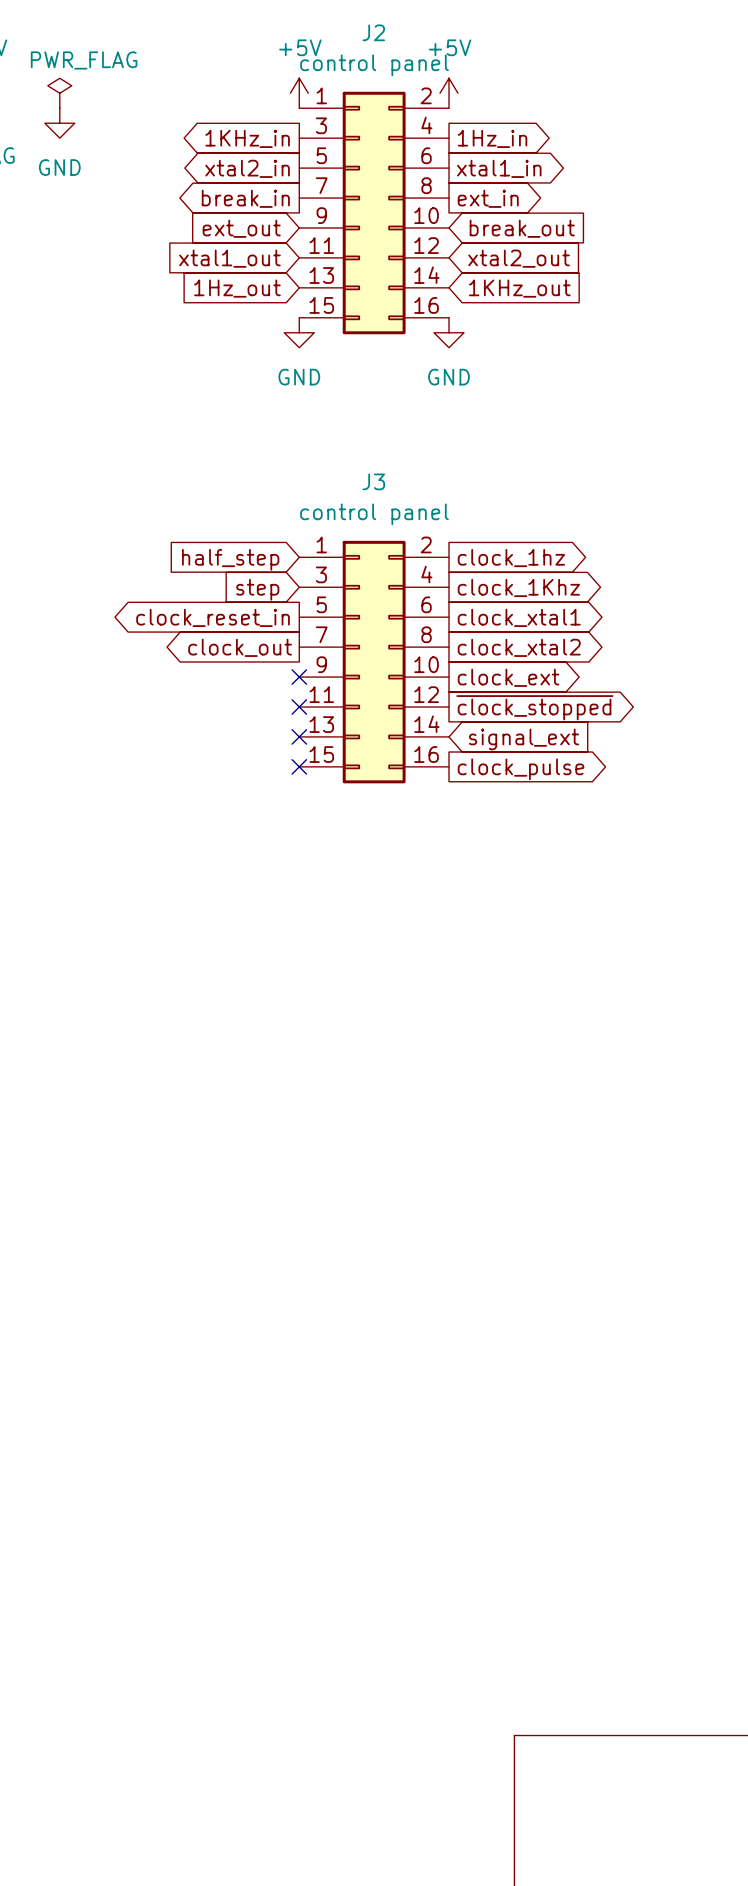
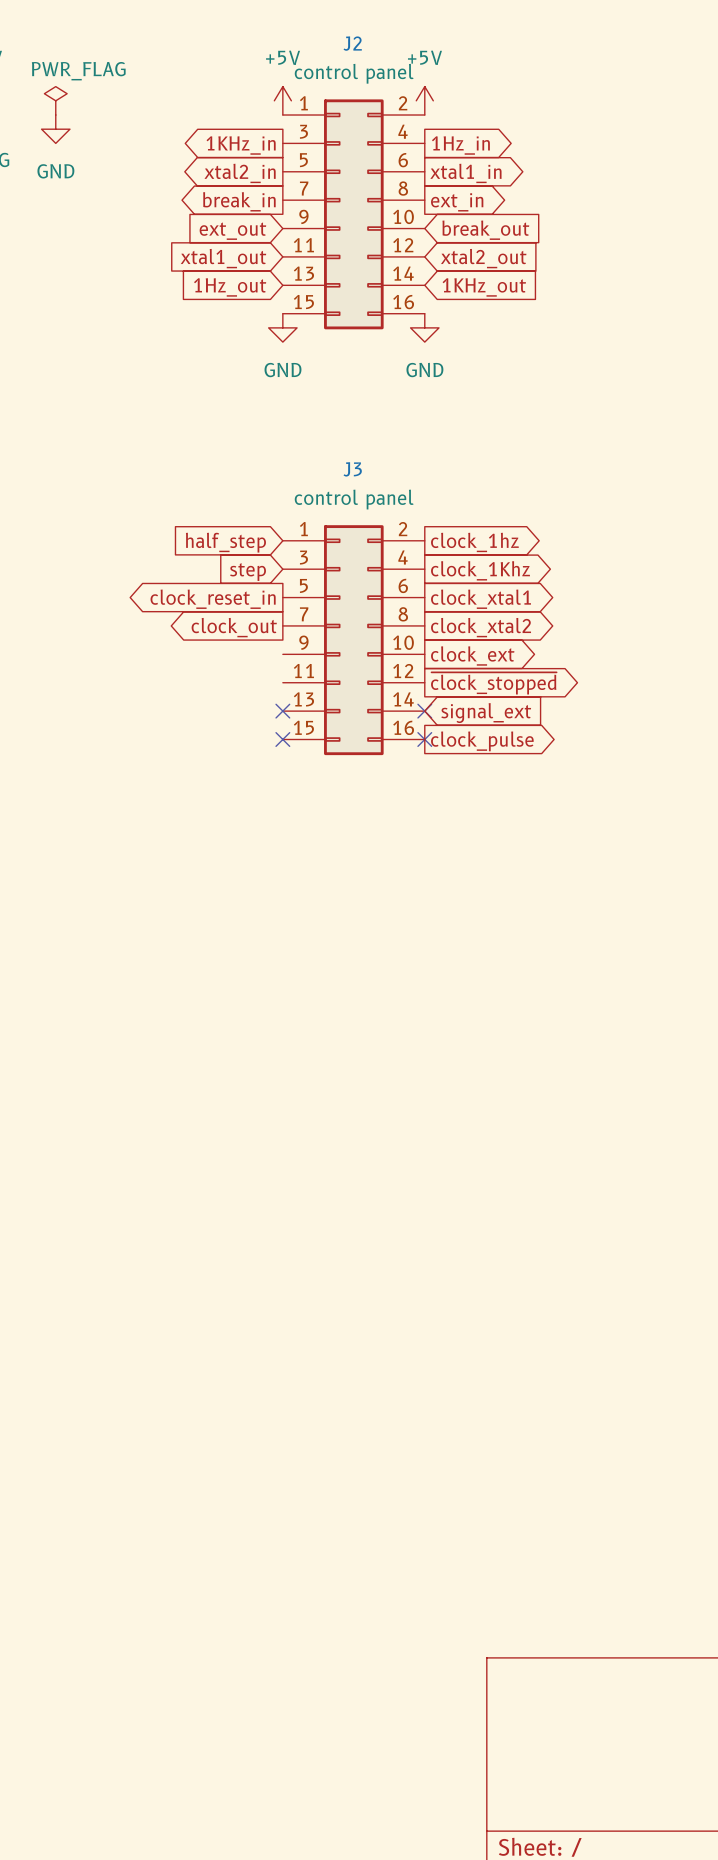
no-connect mark: (299, 677) -> none
no-connect mark: (299, 707) -> none
no-connect mark: none -> (424, 711)
no-connect mark: none -> (424, 739)

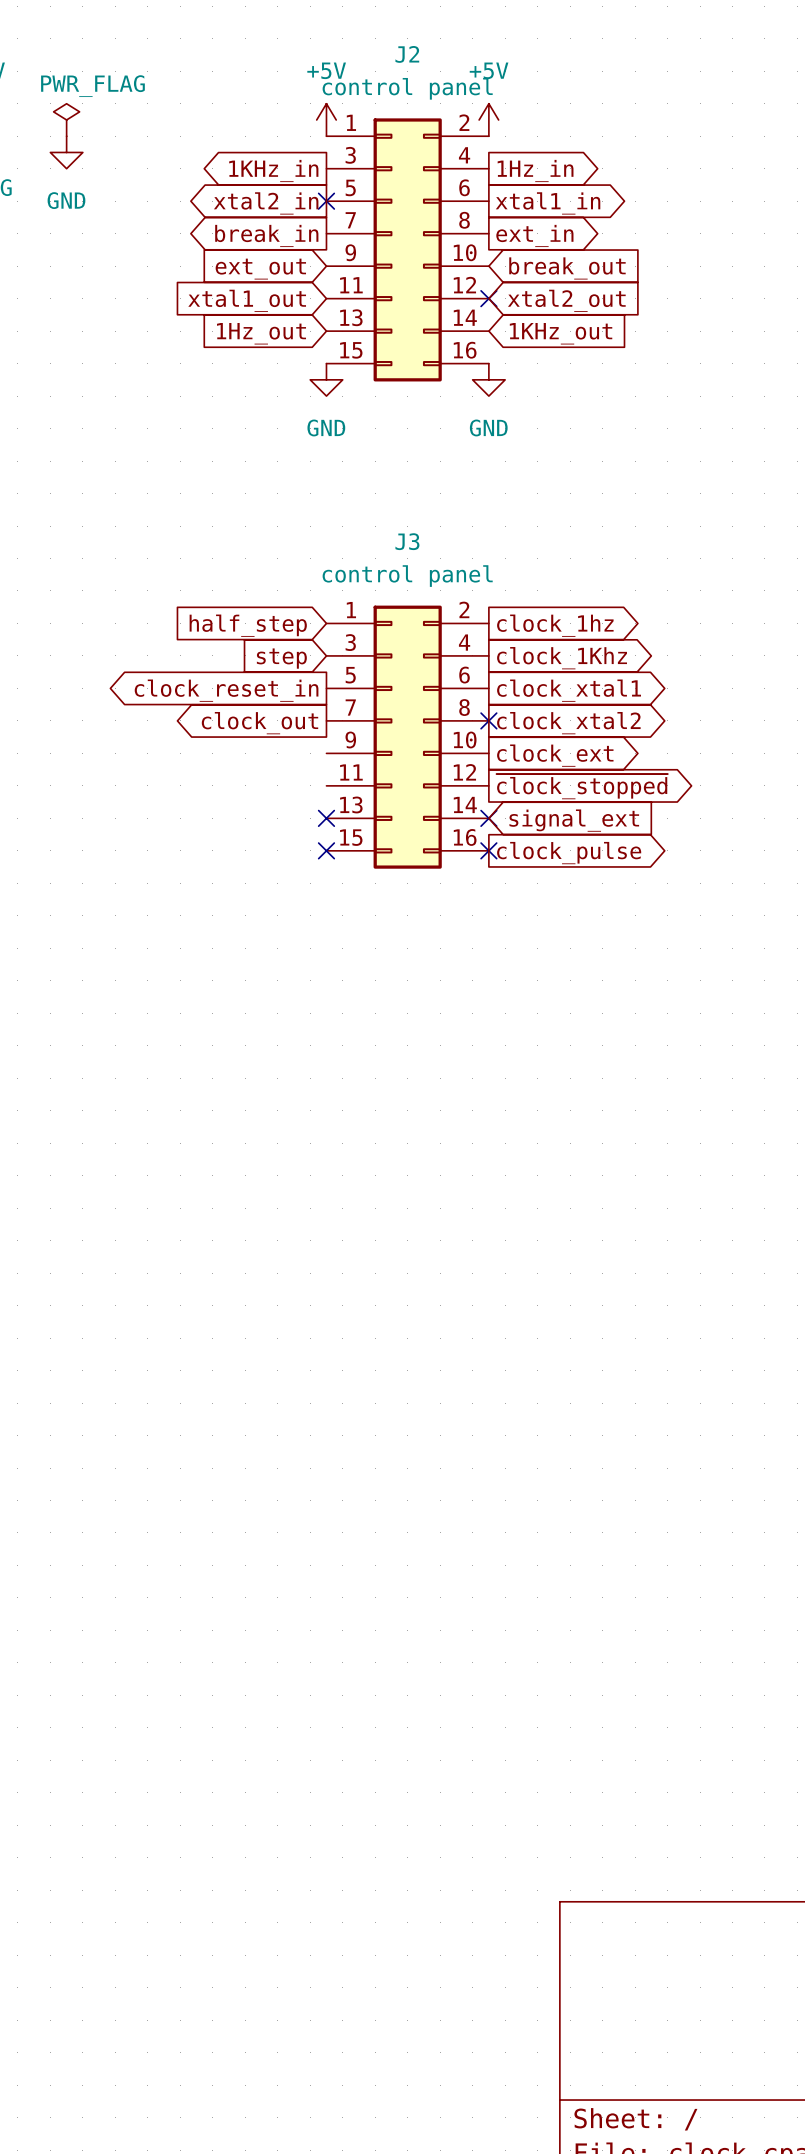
no-connect mark: none -> (326, 201)
no-connect mark: none -> (488, 298)
no-connect mark: none -> (488, 720)

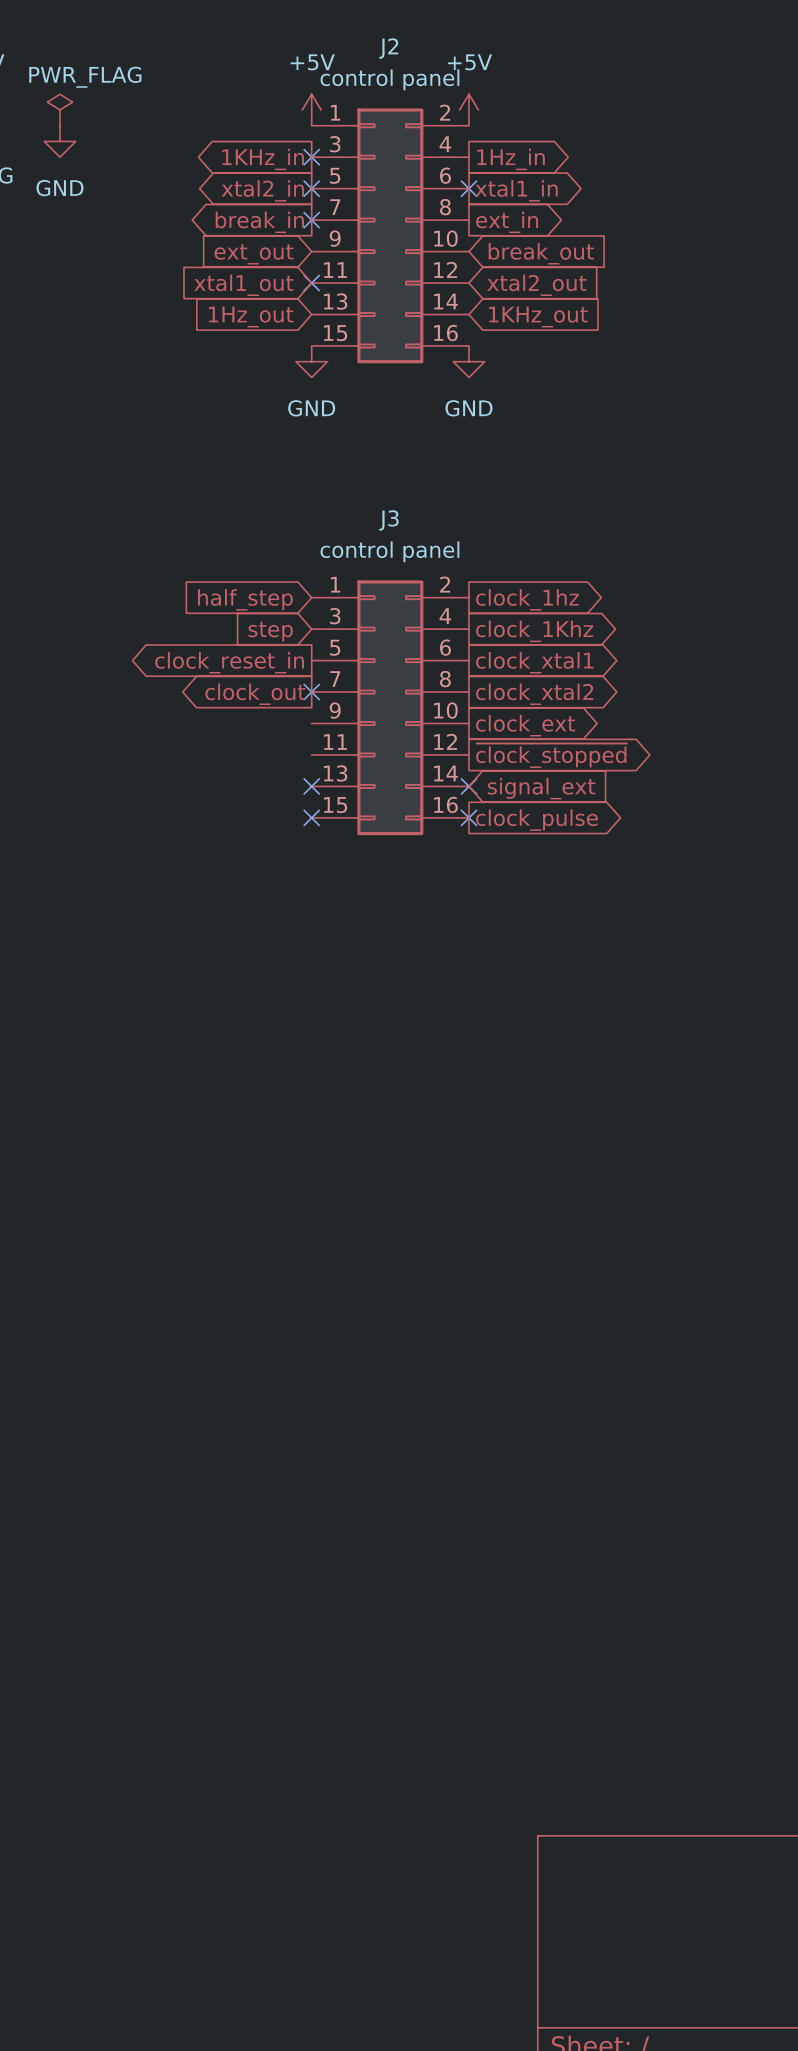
no-connect mark: none -> (311, 157)
no-connect mark: none -> (469, 188)
no-connect mark: none -> (311, 220)
no-connect mark: none -> (311, 283)
no-connect mark: (488, 298) -> none
no-connect mark: none -> (311, 692)
no-connect mark: (488, 720) -> none

